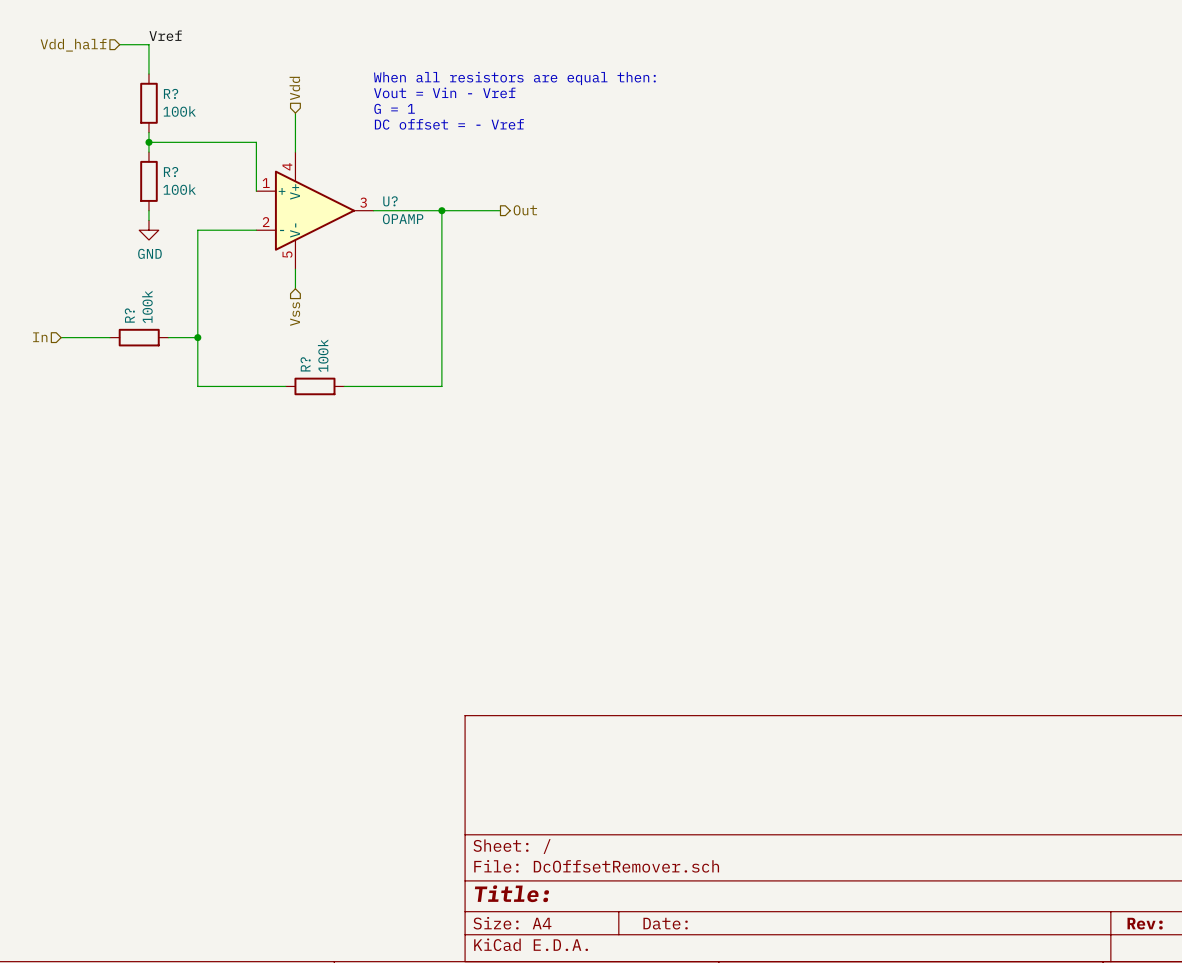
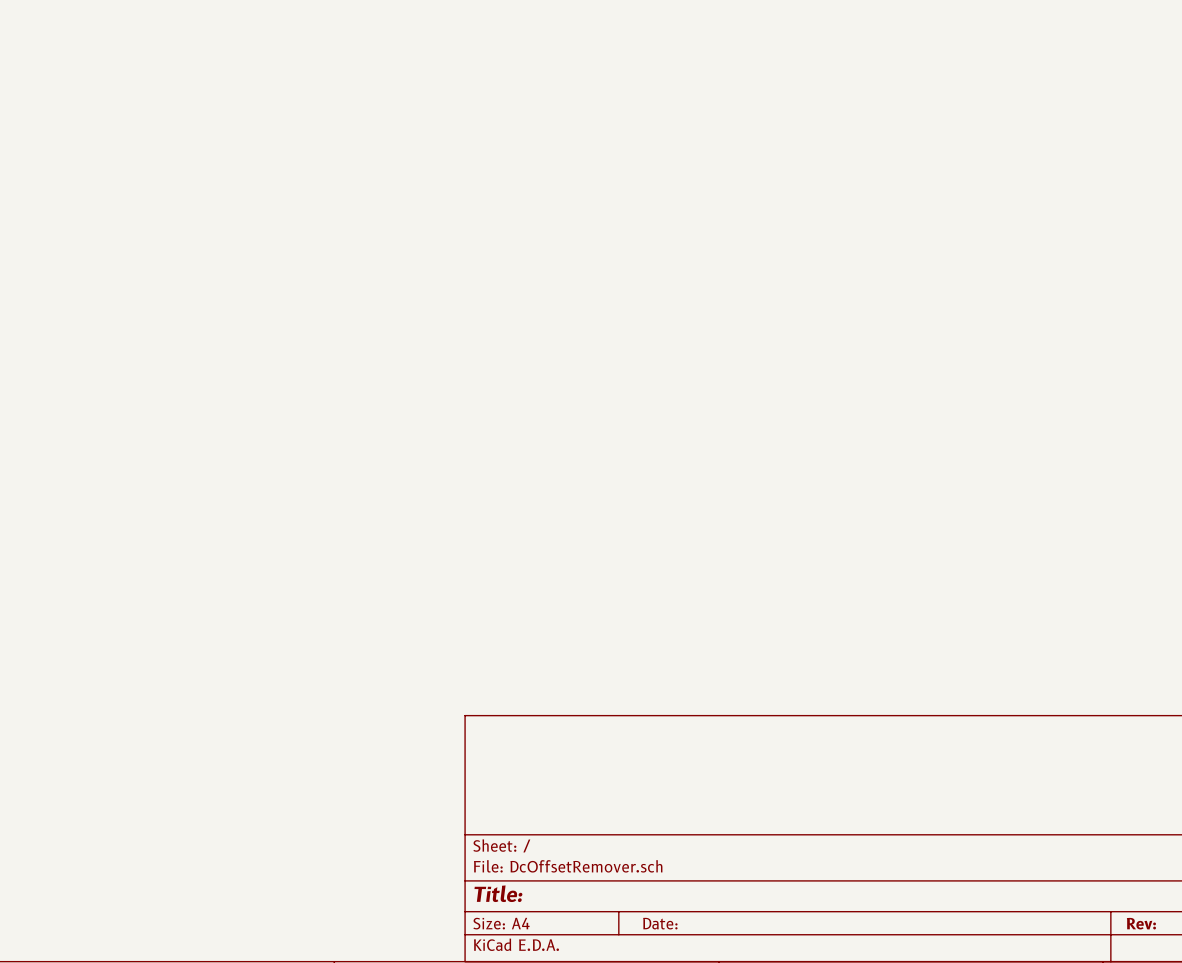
label: Vref (165, 35) -> none
wire: (119, 44) (148, 44) (148, 73) -> none
hierarchical label: Vdd_half (73, 45) -> none
text: When all resistors are equal then: (514, 78) -> none
hierarchical label: Vdd (294, 88) -> none
text: Vout = Vin - Vref (444, 92) -> none
R?: 100k (148, 103) -> none
text: G = 1 (394, 108) -> none
wire: (295, 113) (295, 152) -> none
text: DC offset = - Vref (449, 124) -> none
wire: (148, 132) (148, 152) -> none
wire: (148, 142) (256, 142) (256, 191) -> none
junction: (148, 142) -> none
R?: 100k (148, 181) -> none
wire: (148, 210) (148, 220) -> none
U?: OPAMP (314, 210) -> none
wire: (373, 210) (500, 210) -> none
wire: (441, 210) (441, 386) (344, 386) -> none
junction: (441, 210) -> none
hierarchical label: Out (525, 210) -> none
power symbol: GND (148, 230) -> none
wire: (256, 230) (197, 230) (197, 386) (285, 386) -> none
wire: (295, 269) (295, 288) -> none
hierarchical label: Vss (295, 314) -> none
hierarchical label: In (40, 337) -> none
wire: (61, 337) (109, 337) -> none
R?: 100k (139, 337) -> none
wire: (168, 337) (197, 337) -> none
junction: (197, 337) -> none
R?: 100k (314, 386) -> none

